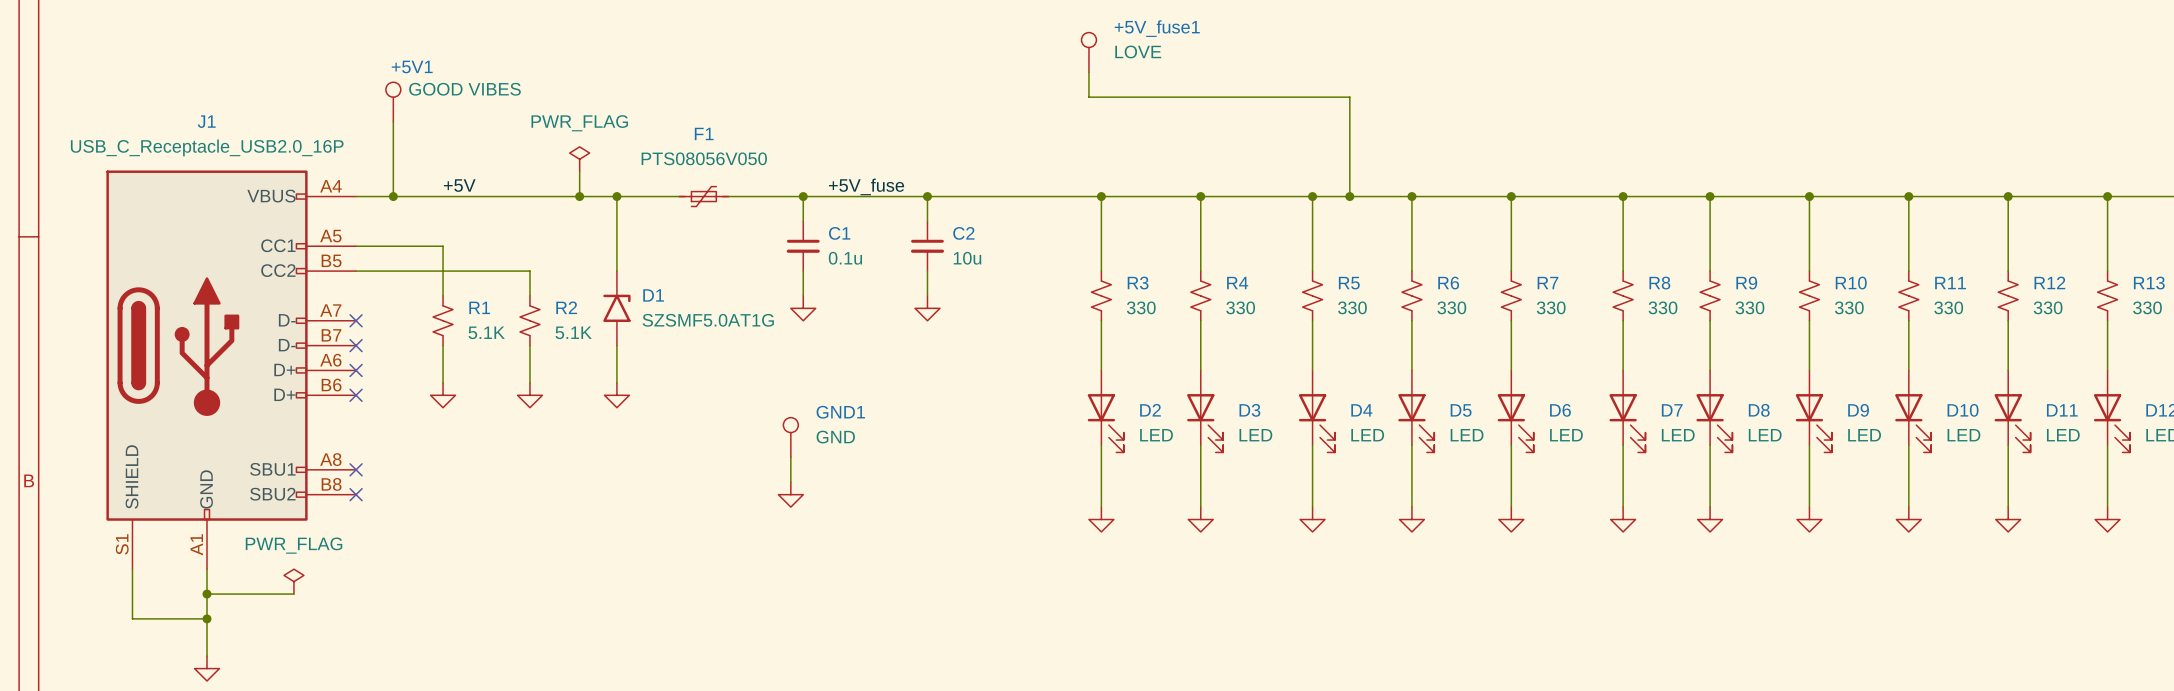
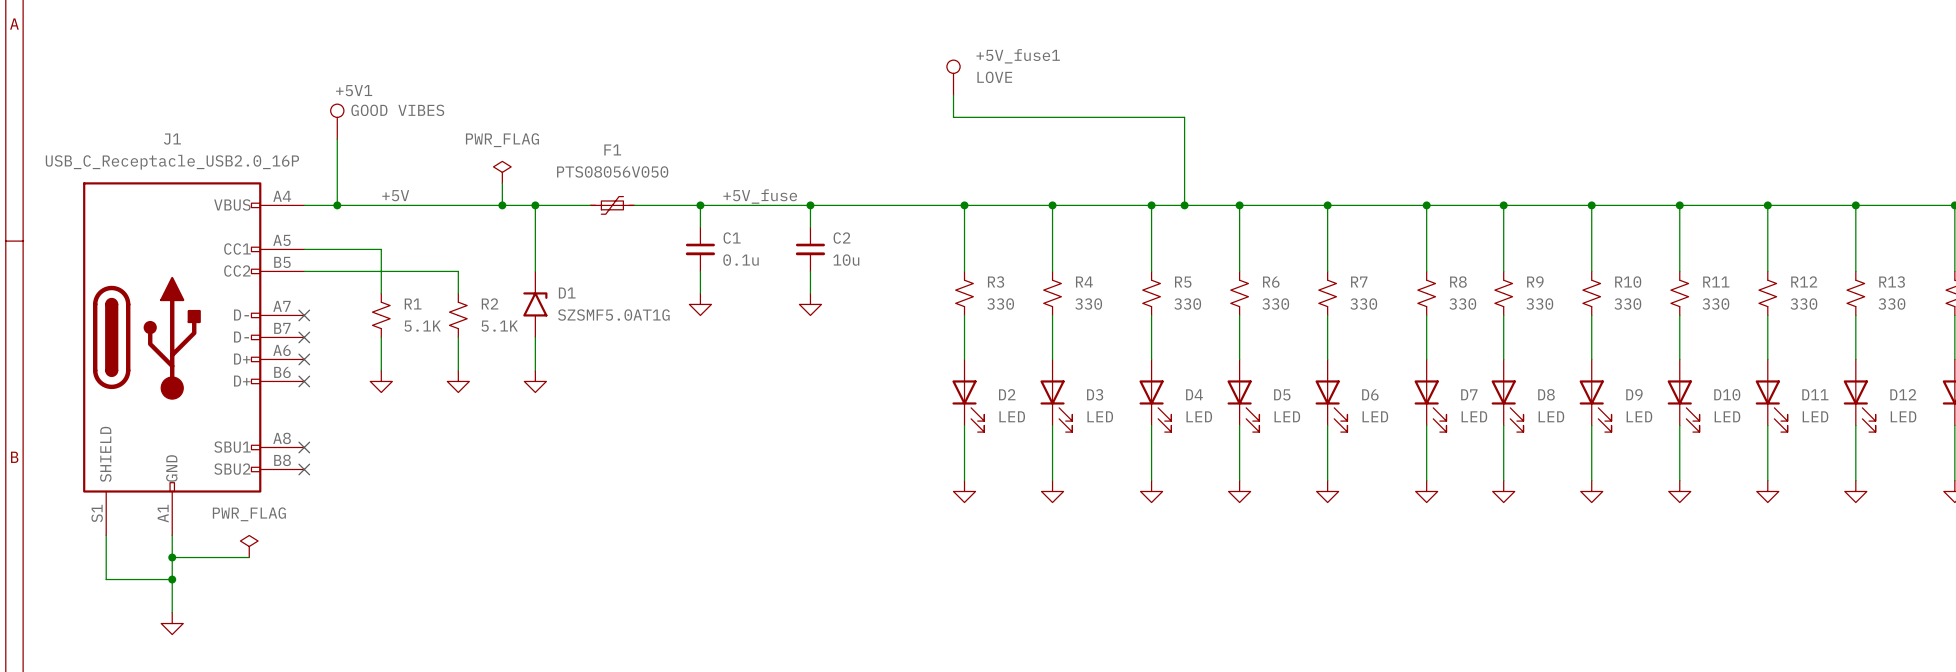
GND1: GND (790, 437) -> none
wire: (790, 457) (790, 482) -> none
power symbol: (790, 494) -> none

